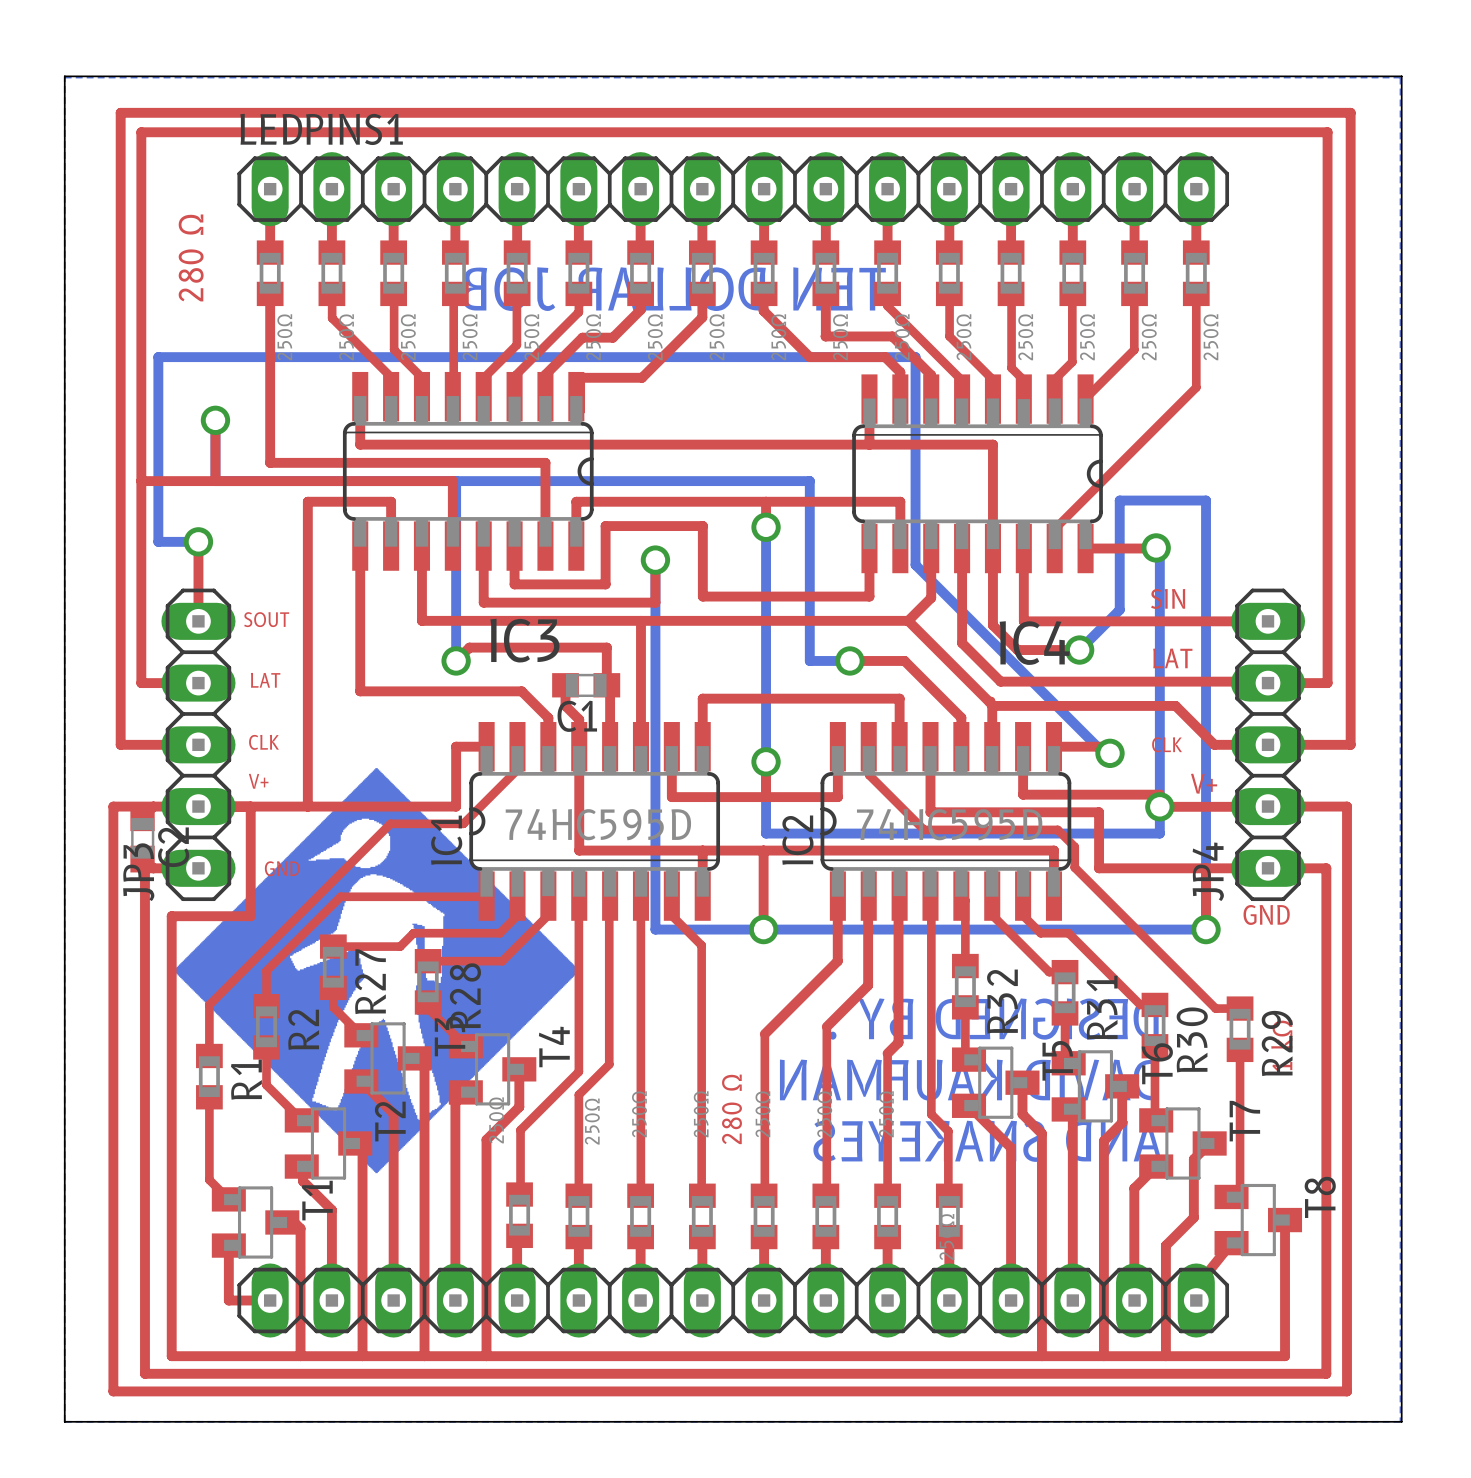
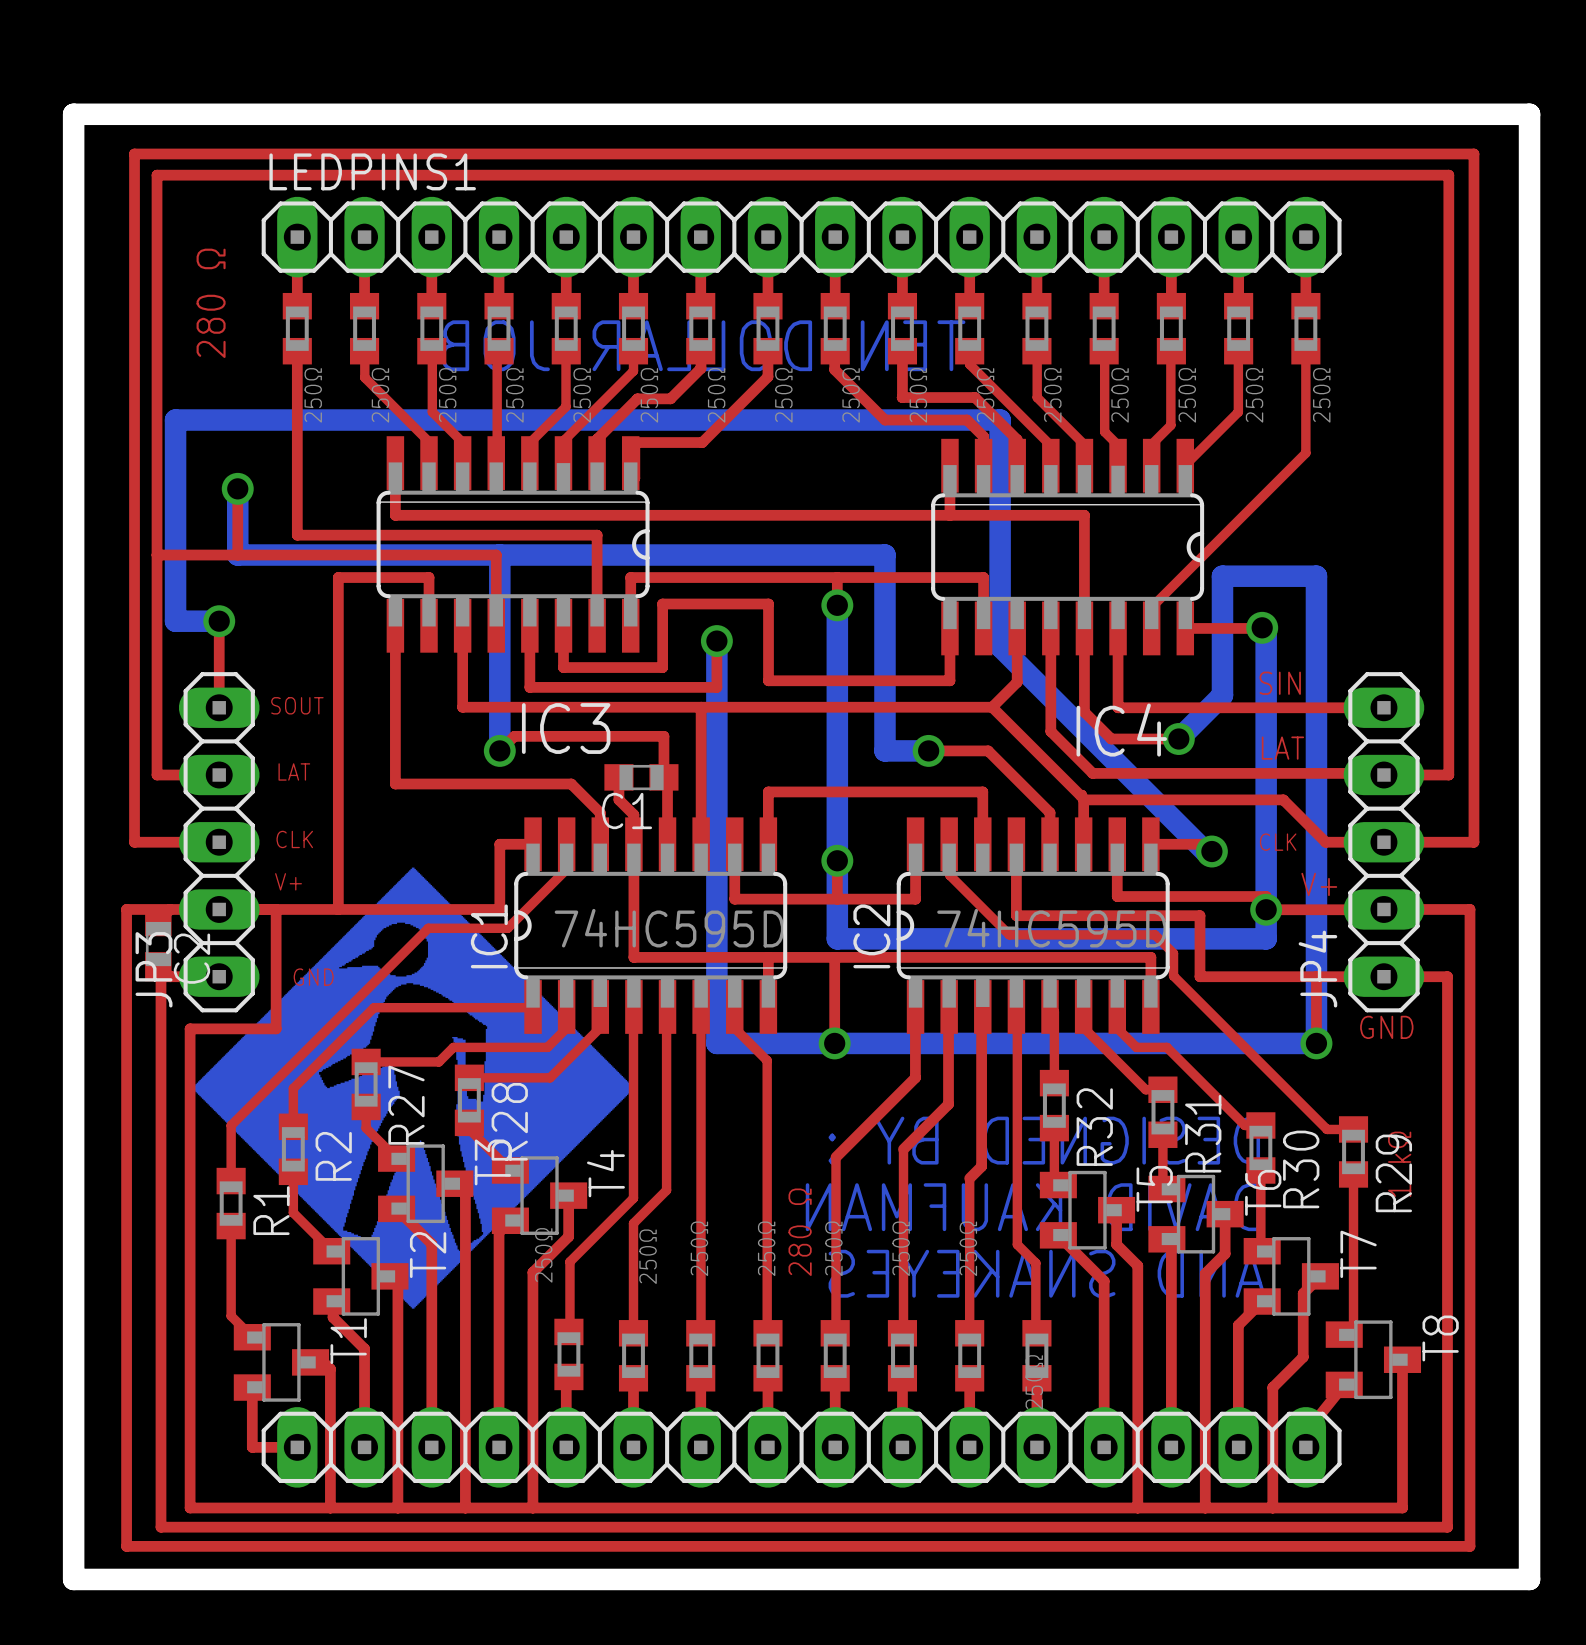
board edge width: thin (64, 76) (1401, 76) (1401, 1421) (64, 1421) (64, 76) -> thick (73, 114) (1529, 114) (1529, 1579) (73, 1579) (73, 114)
bottom track width: thin (215, 420) (215, 481) (809, 481) (809, 660) (849, 660) -> thick (237, 488) (237, 555) (884, 555) (884, 750) (928, 750)
bottom track width: thin (456, 481) (456, 660) -> thick (499, 555) (499, 750)
bottom track width: thin (766, 527) (766, 833) (1159, 833) (1159, 547) -> thick (837, 605) (837, 938) (1266, 938) (1266, 627)
bottom track width: thin (198, 541) (158, 541) (158, 357) (915, 357) (915, 564) (1103, 753) -> thick (219, 621) (175, 621) (175, 420) (1000, 420) (1000, 646) (1205, 851)
bottom track width: thin (655, 560) (655, 929) (1206, 929) (1206, 500) (1119, 500) (1119, 609) (1079, 650) -> thick (716, 641) (716, 1043) (1316, 1043) (1316, 576) (1222, 576) (1222, 695) (1178, 739)

